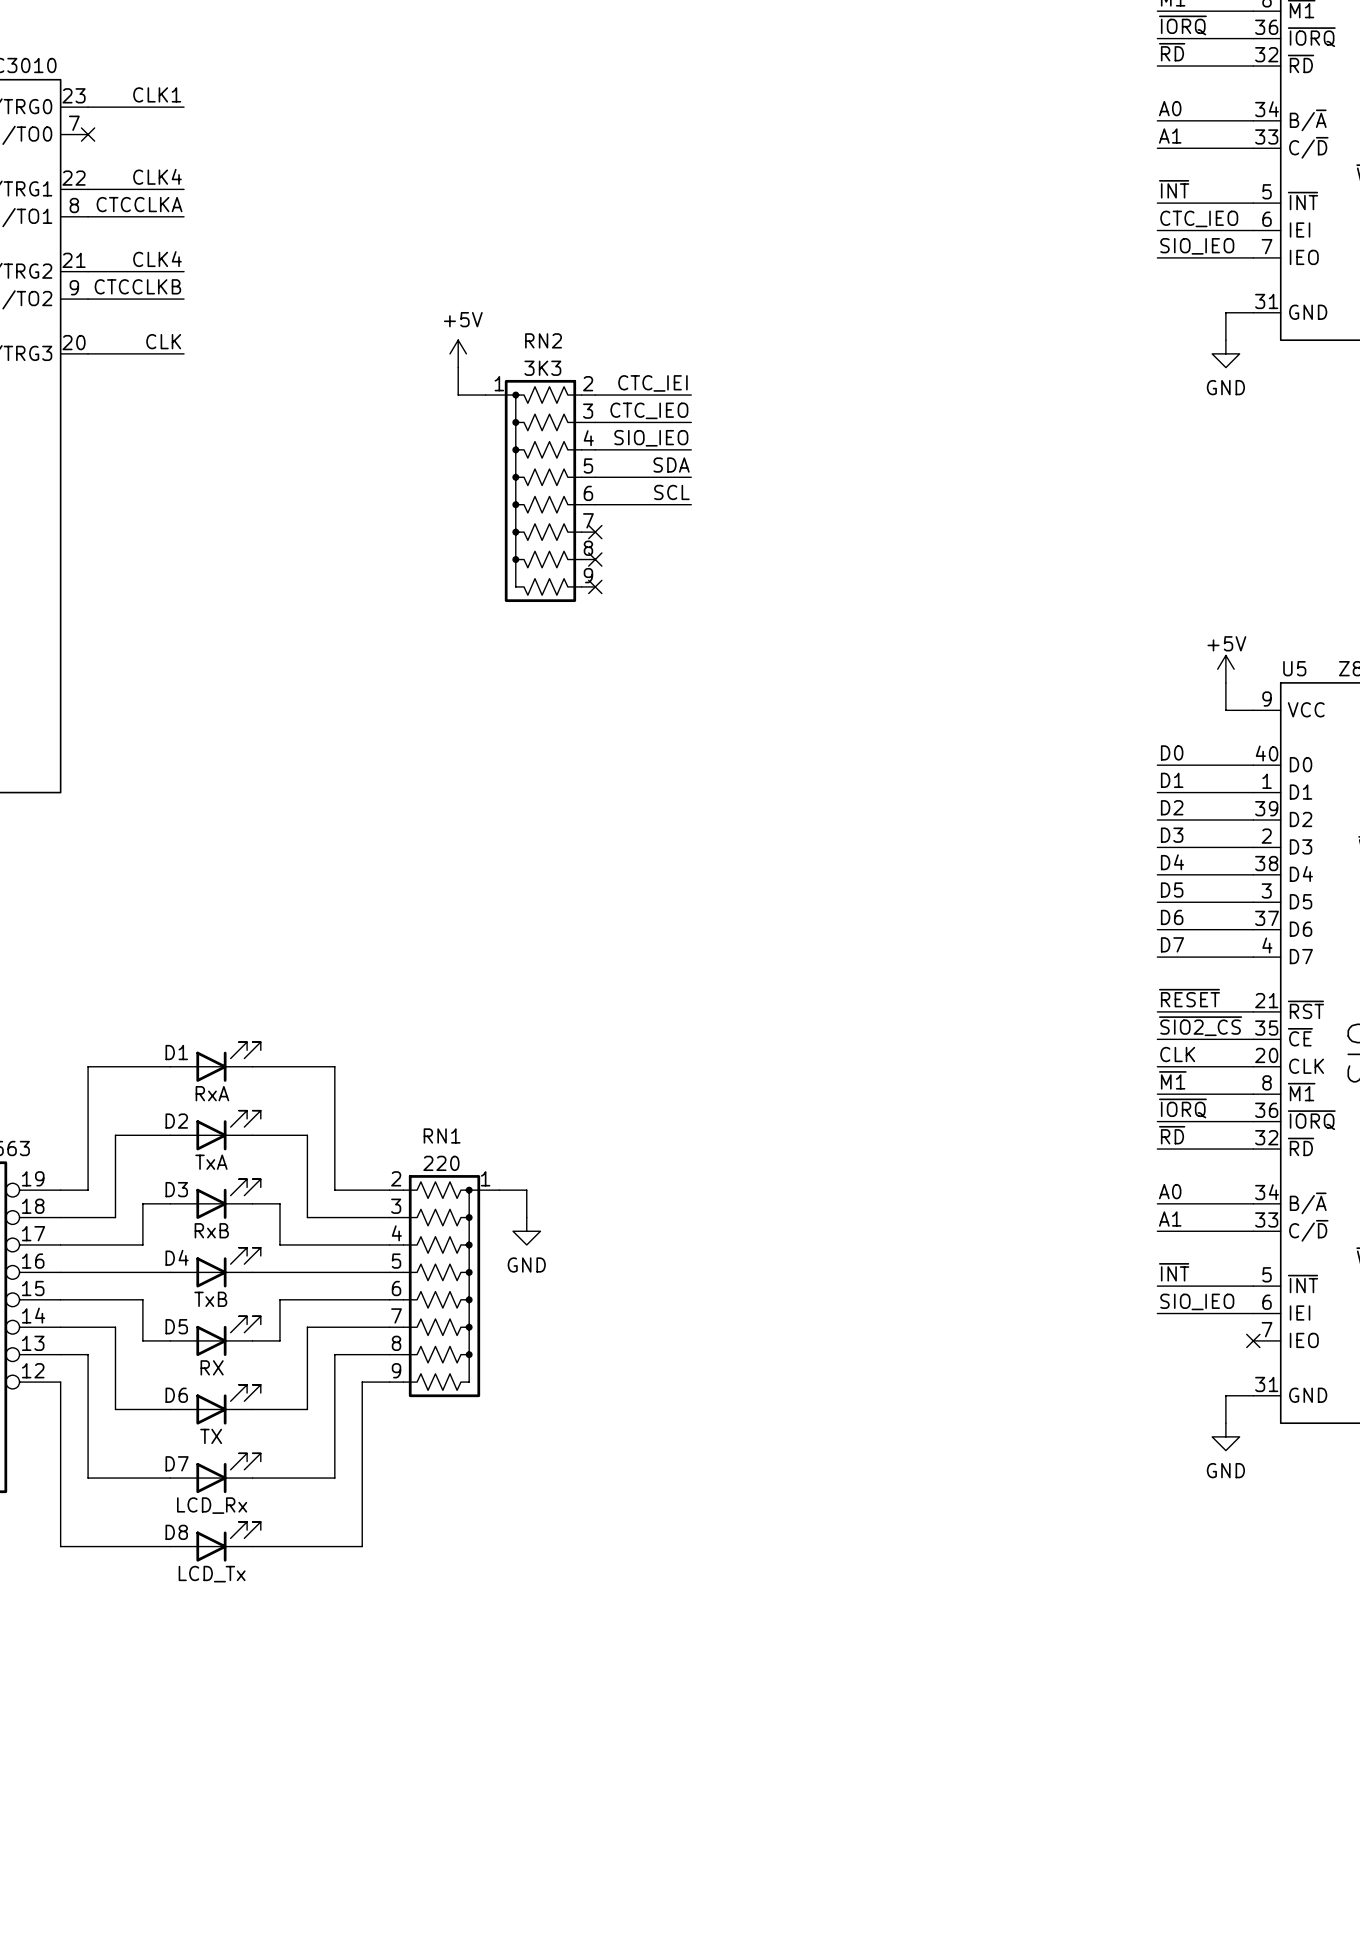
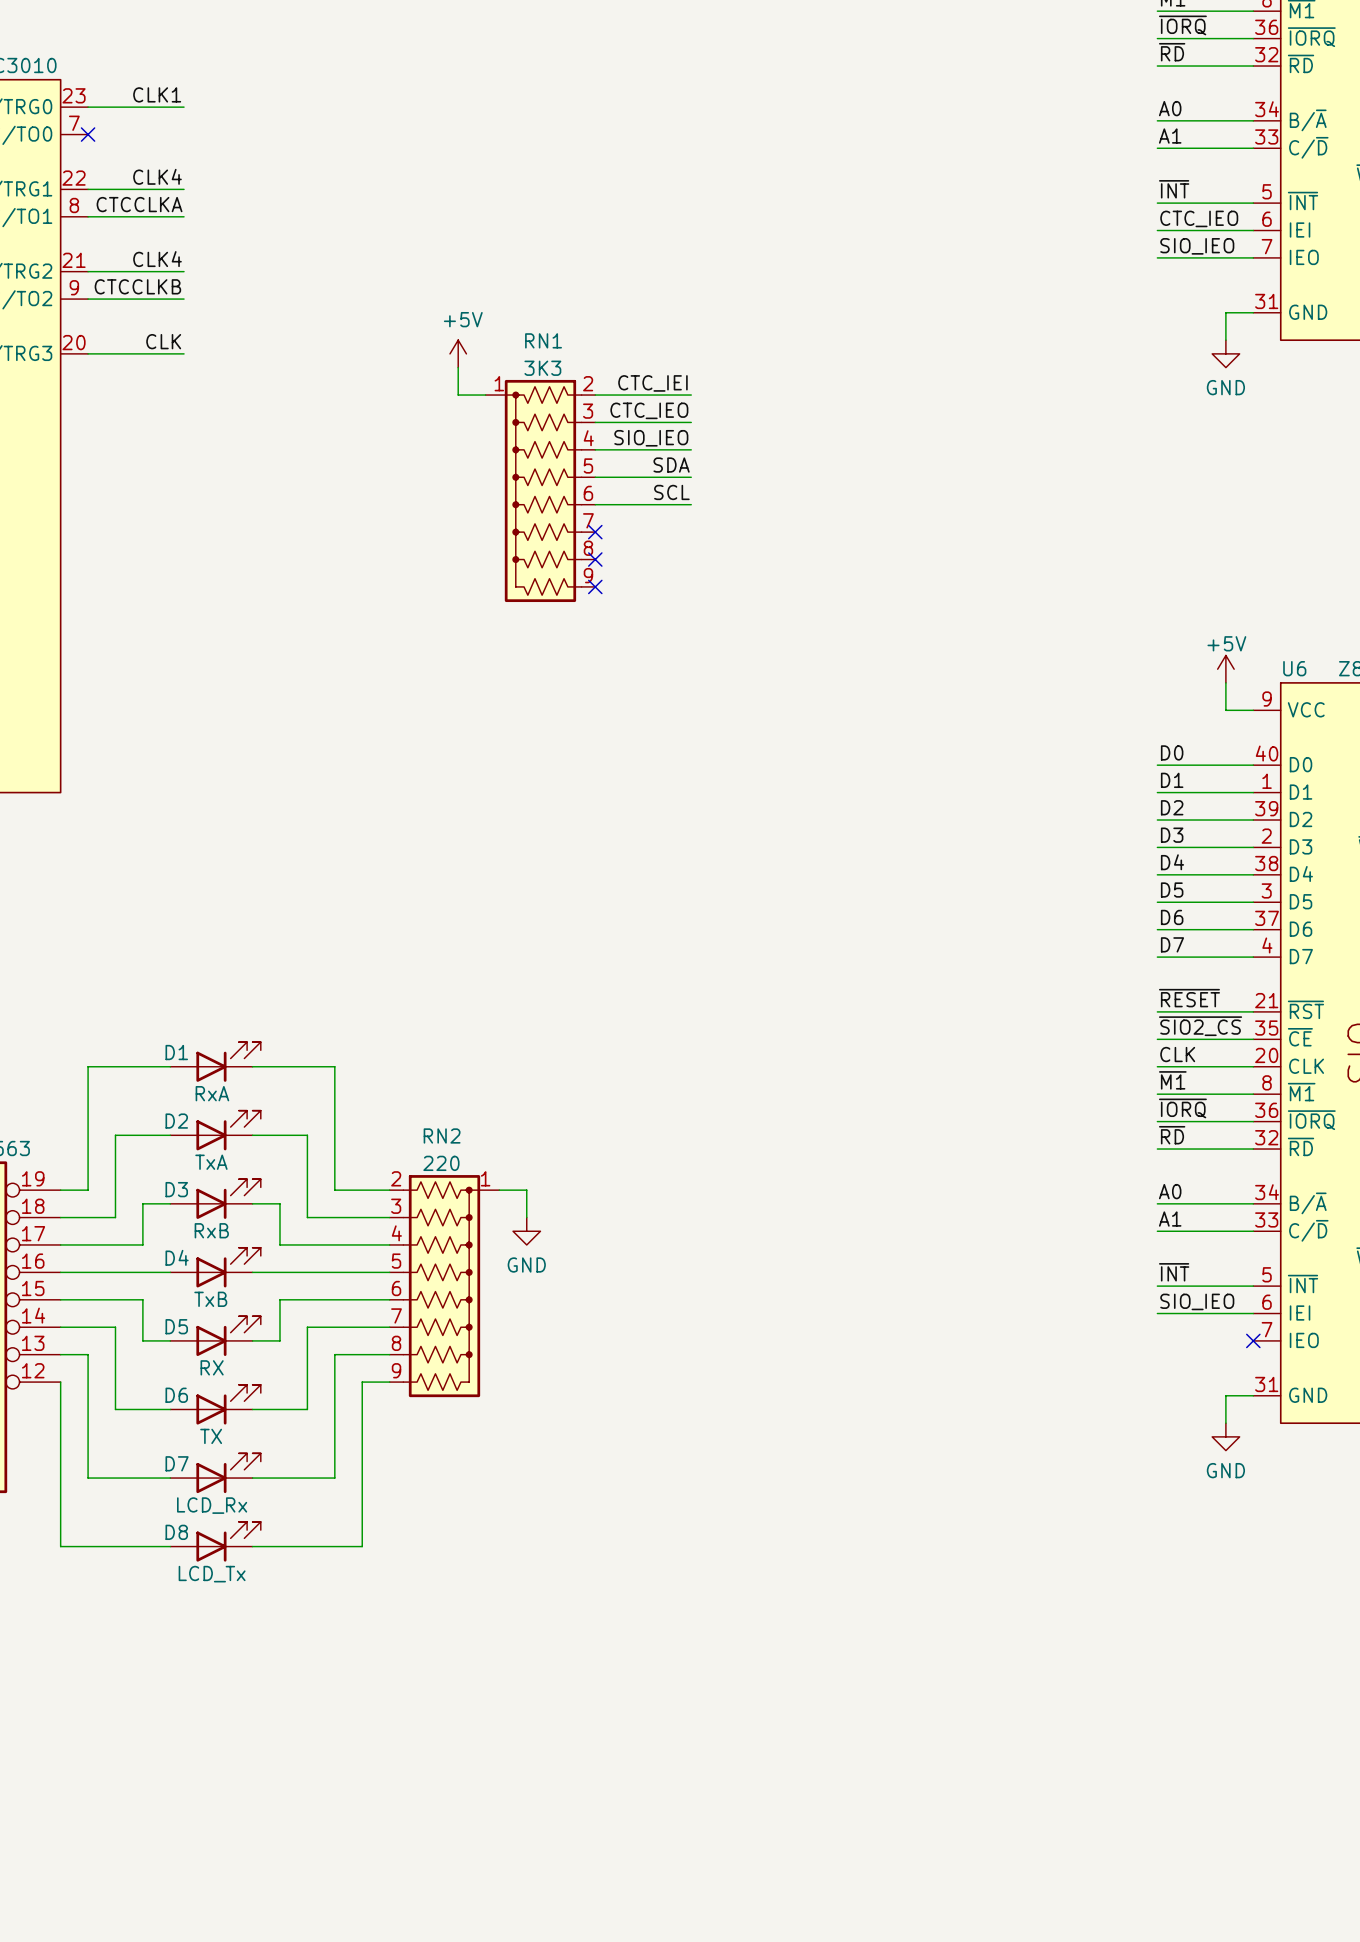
RN2 name: RN2 (543, 340) -> RN1 (543, 340)
U5 name: U5 (1294, 668) -> U6 (1294, 668)
RN1 name: RN1 (442, 1135) -> RN2 (442, 1135)

